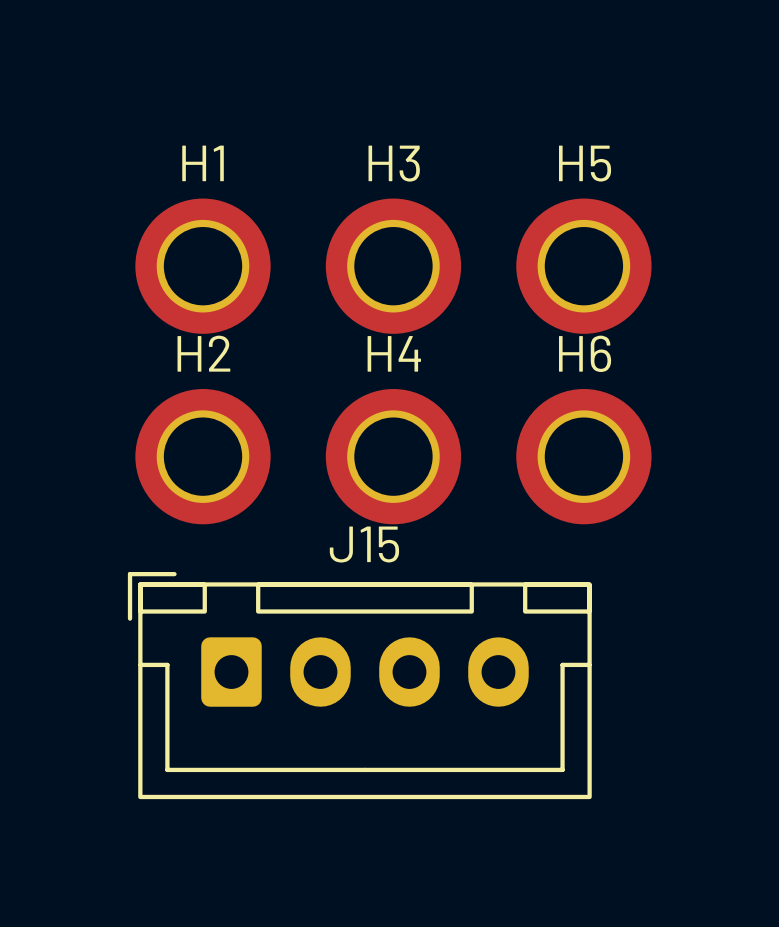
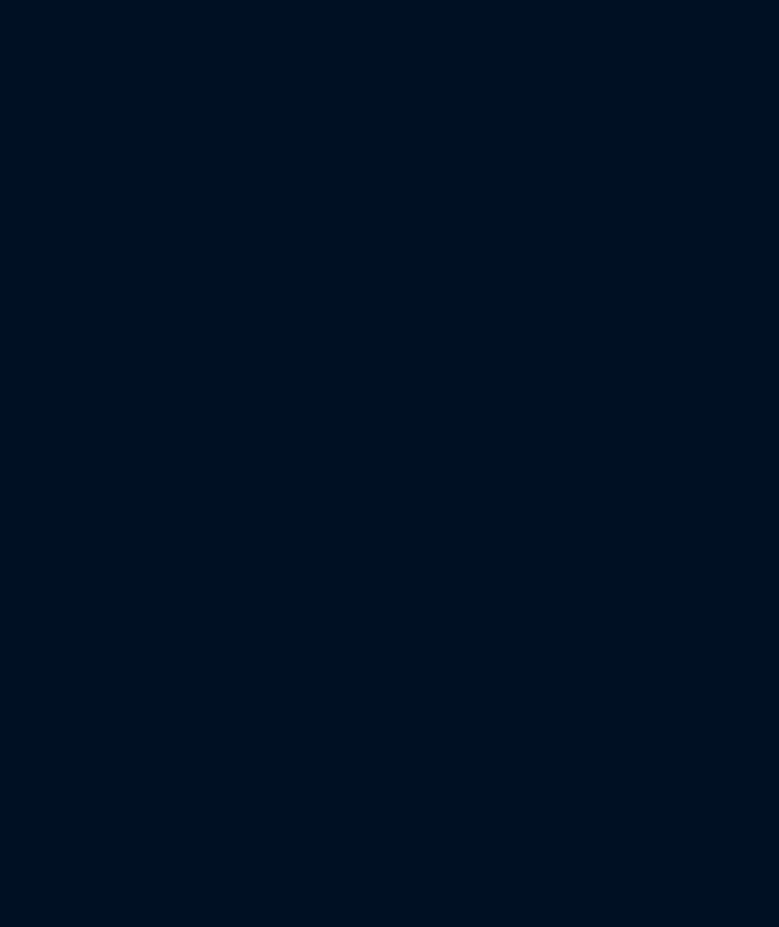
H1: (203, 266) -> none
H3: (393, 266) -> none
H5: (583, 266) -> none
H2: (203, 456) -> none
H4: (393, 456) -> none
H6: (583, 456) -> none
J15: (359, 685) -> none

